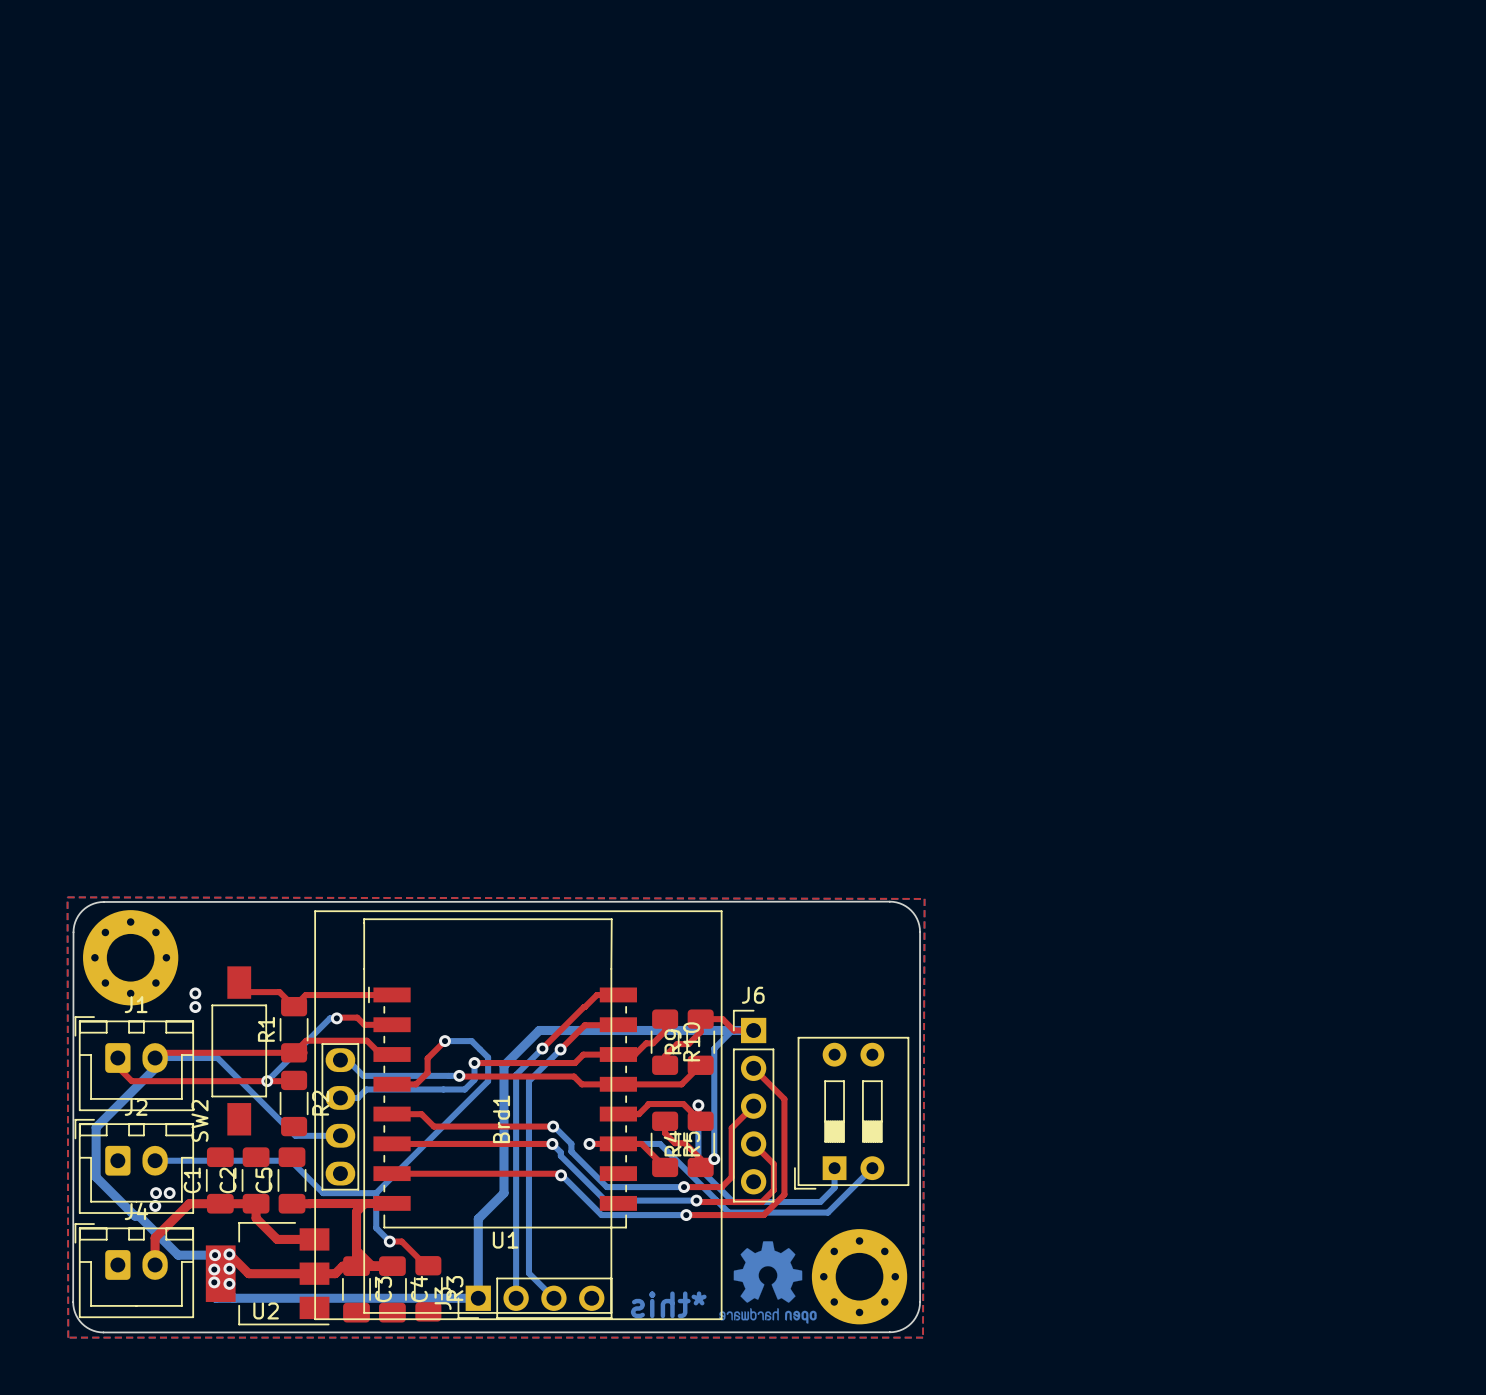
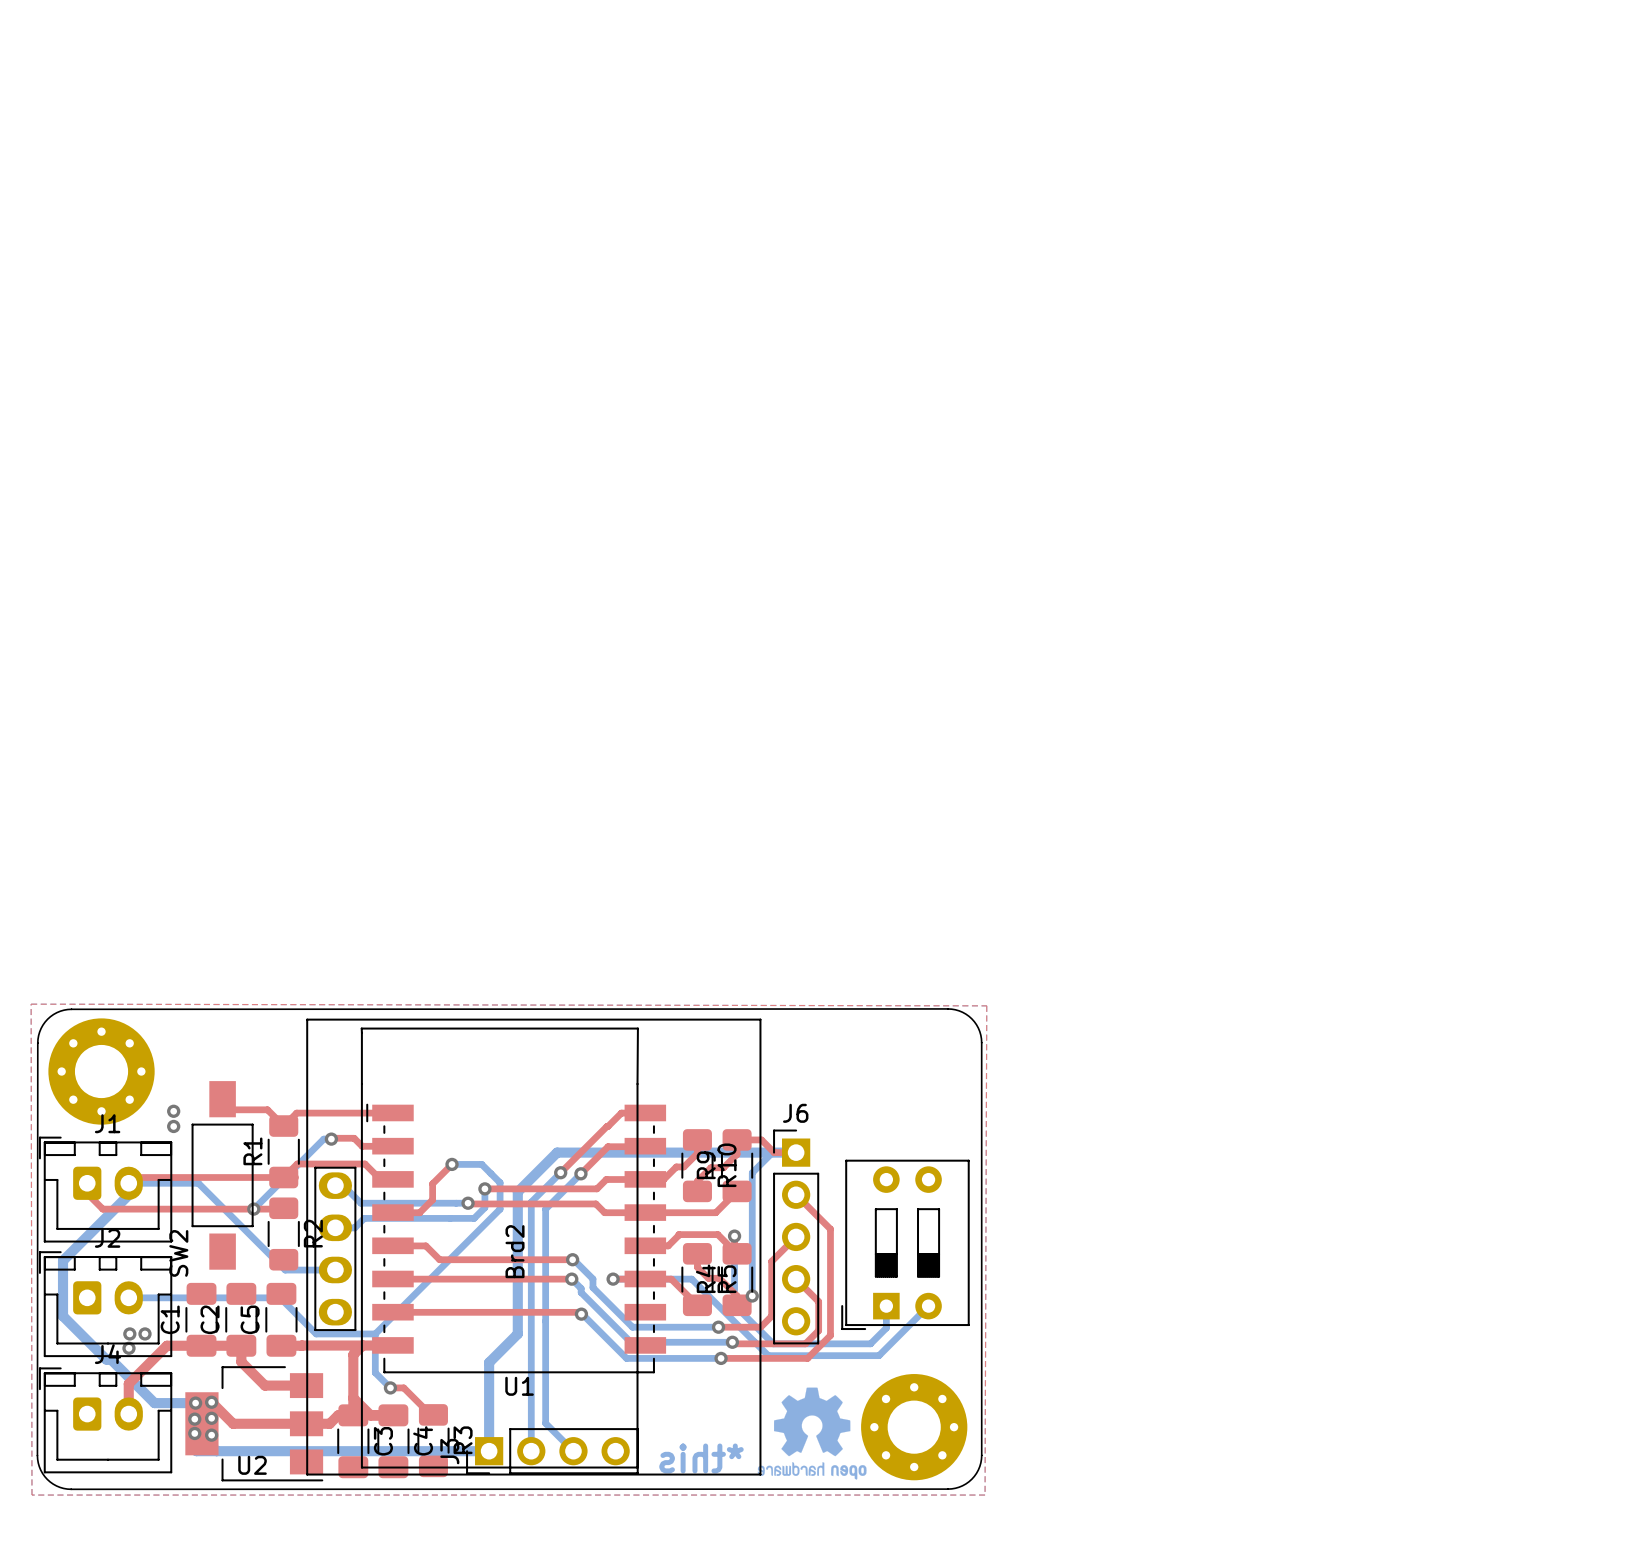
Brd1 name: Brd1 (501, 1119) -> Brd2 (515, 1251)

